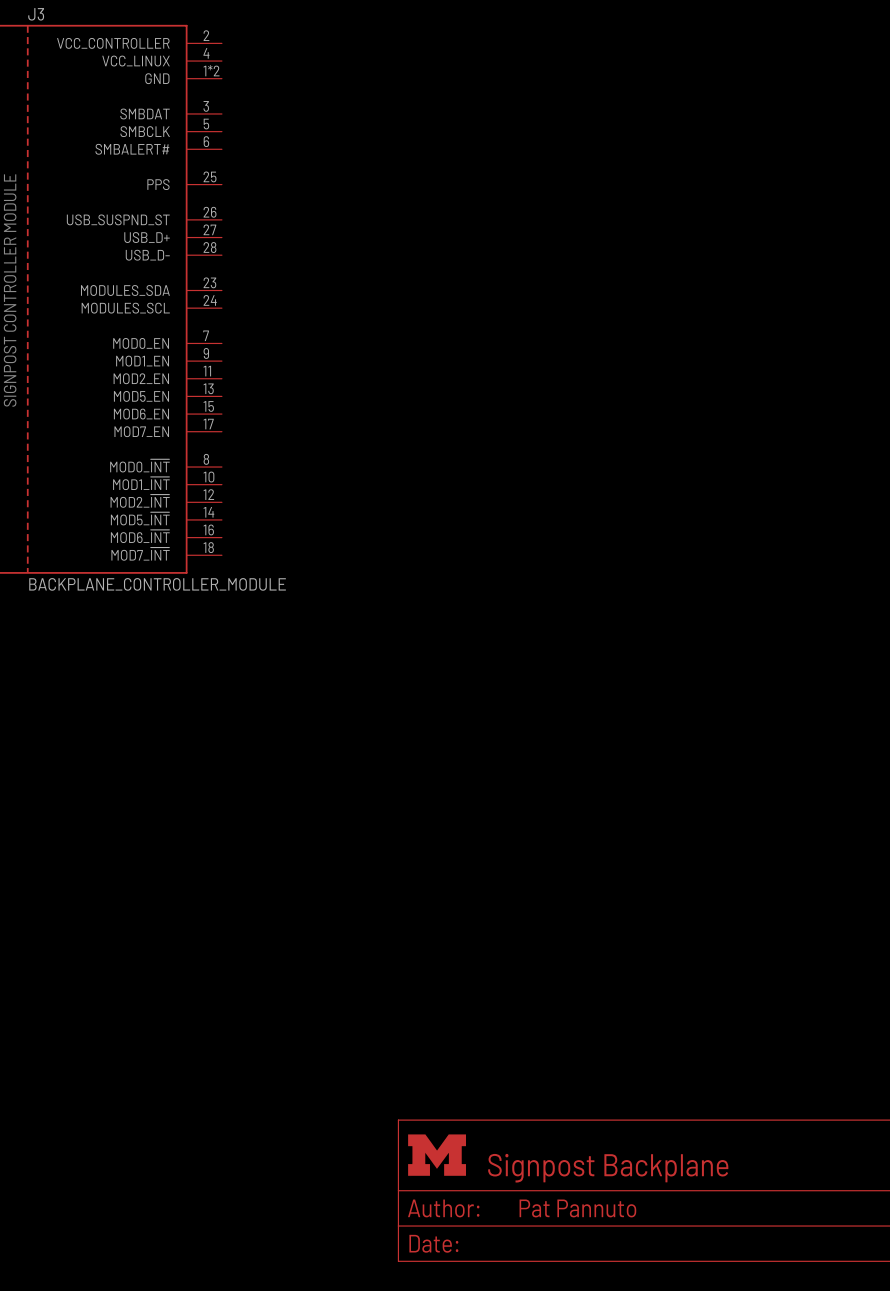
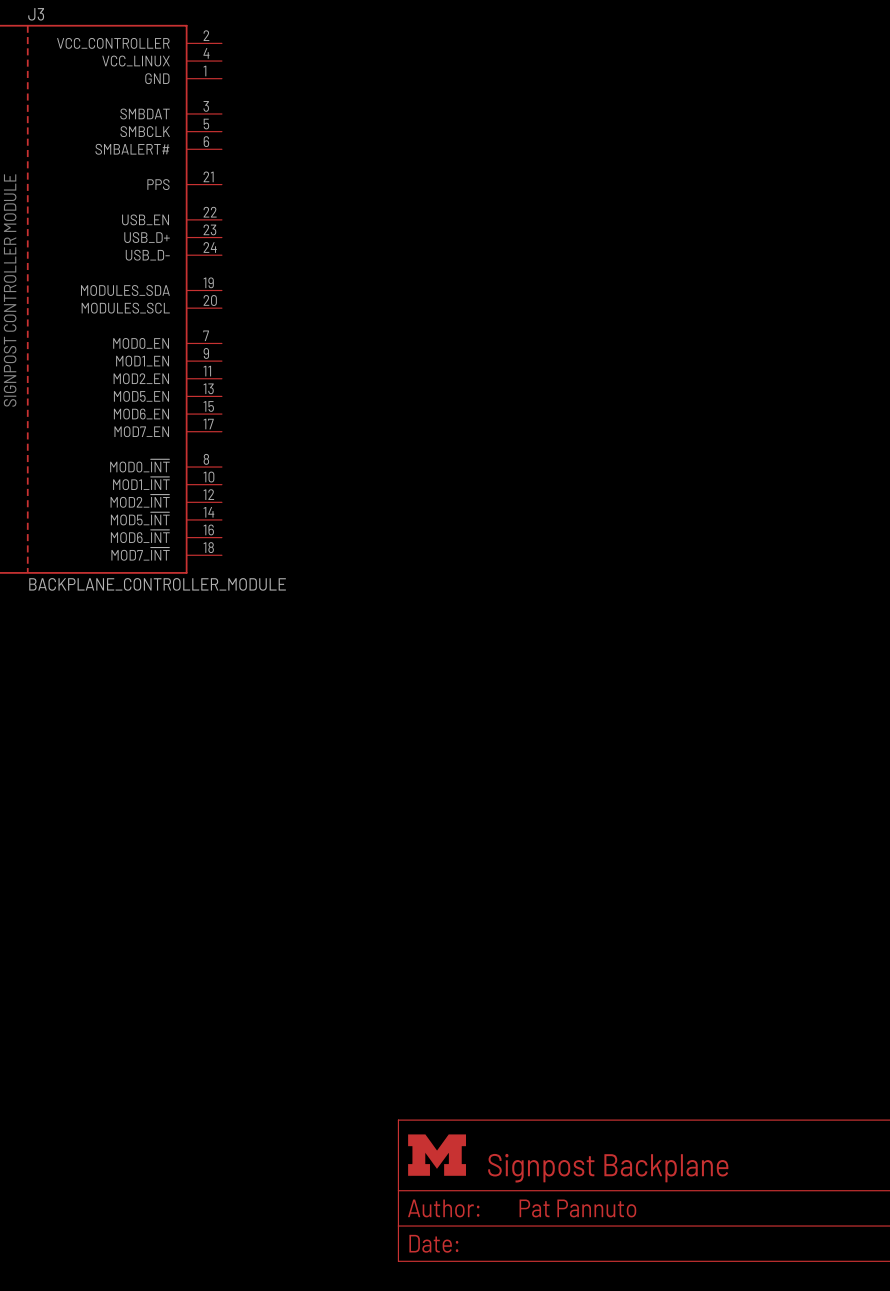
J3 pin number: 1*2 (211, 70) -> 1 (204, 71)
J3 pin number: 25 (210, 176) -> 21 (208, 176)
J3 pin number: 26 (210, 212) -> 22 (210, 212)
J3 pin name: USB_SUSPND_ST (118, 219) -> USB_EN (145, 219)
J3 pin number: 27 (209, 229) -> 23 (209, 229)
J3 pin number: 28 (209, 247) -> 24 (210, 247)
J3 pin number: 23 (209, 282) -> 19 (208, 282)
J3 pin number: 24 (210, 300) -> 20 (210, 300)

